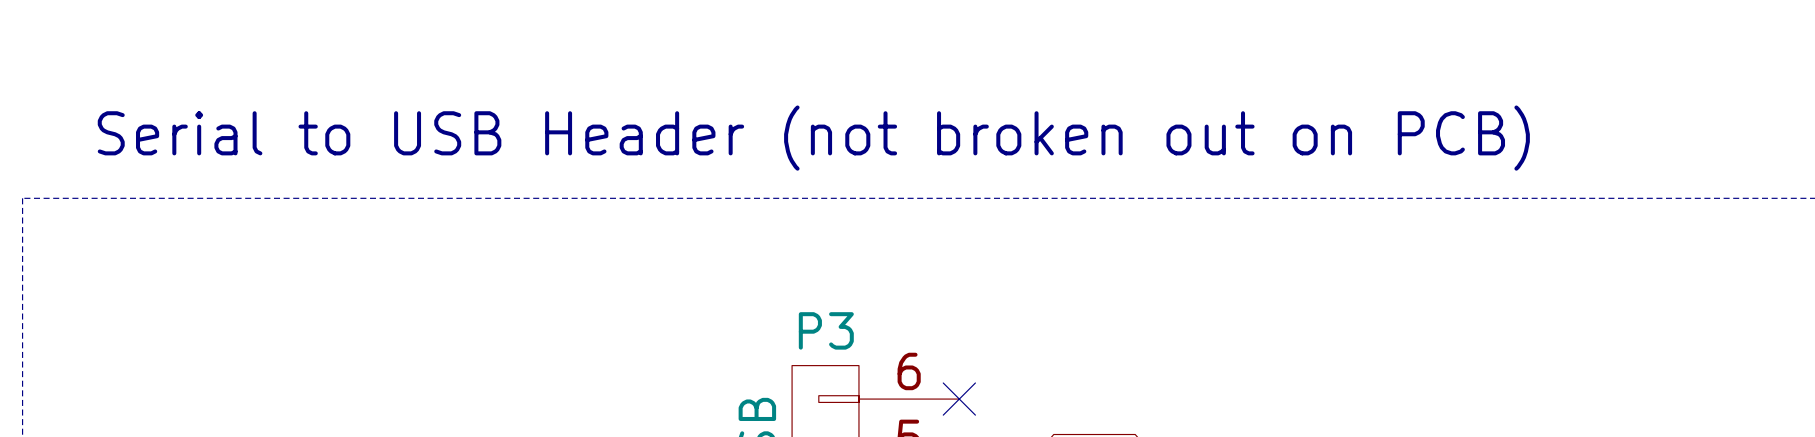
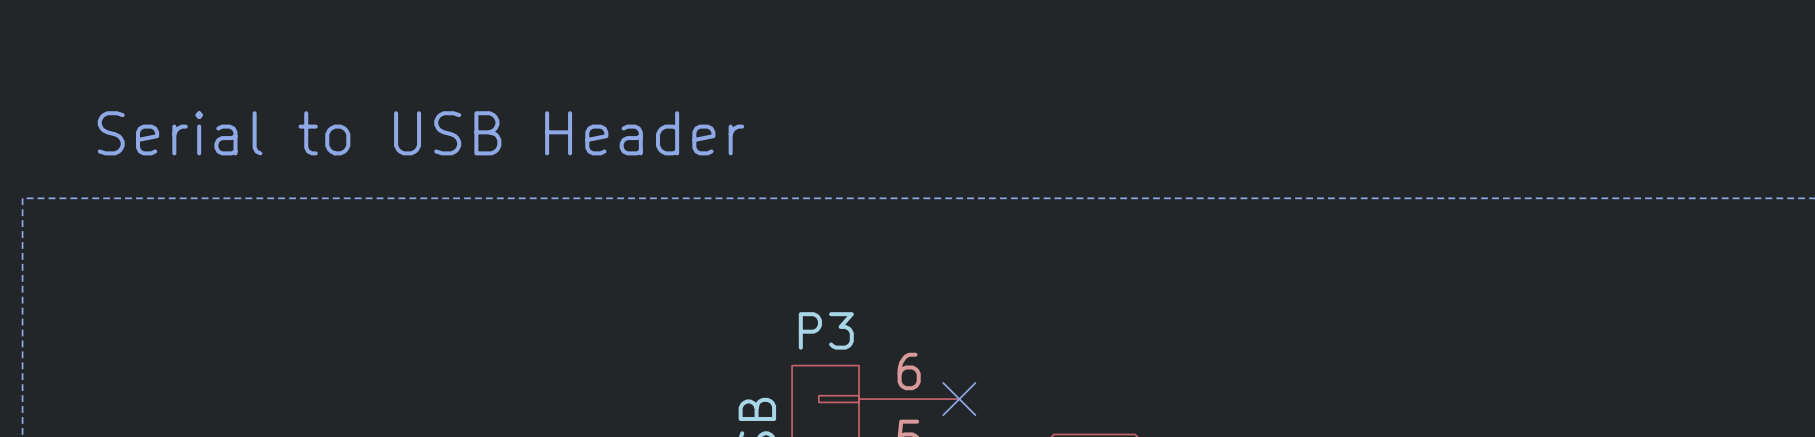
text: Serial to USB Header (not broken out on PCB) (813, 138) -> Serial to USB Header (420, 133)

